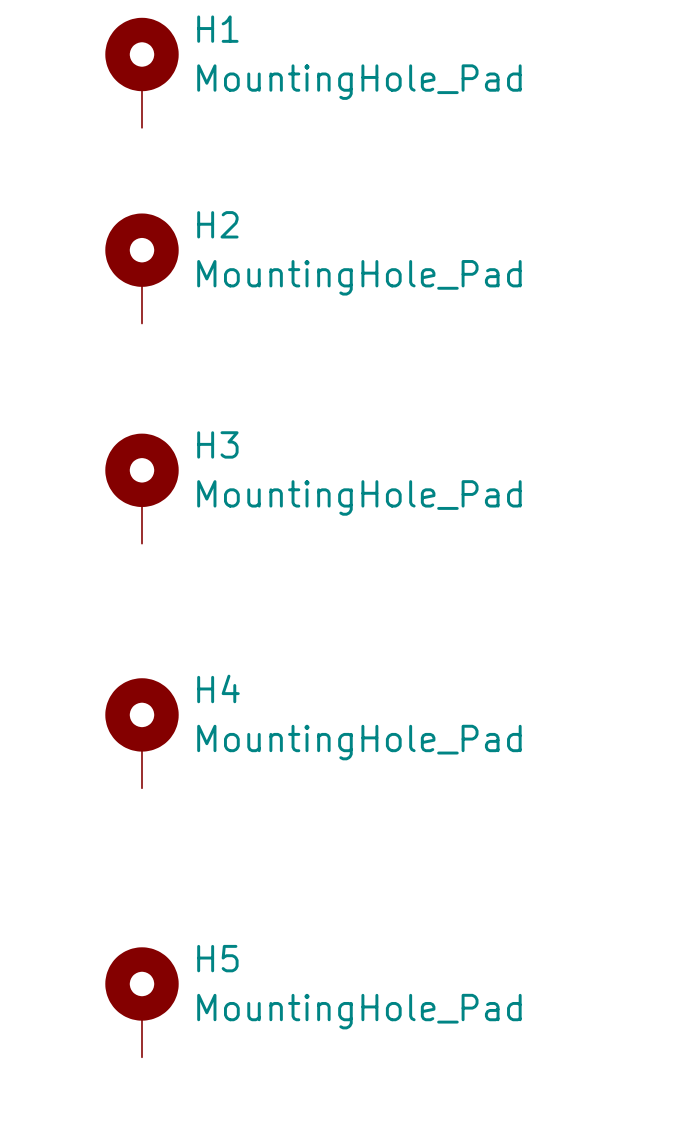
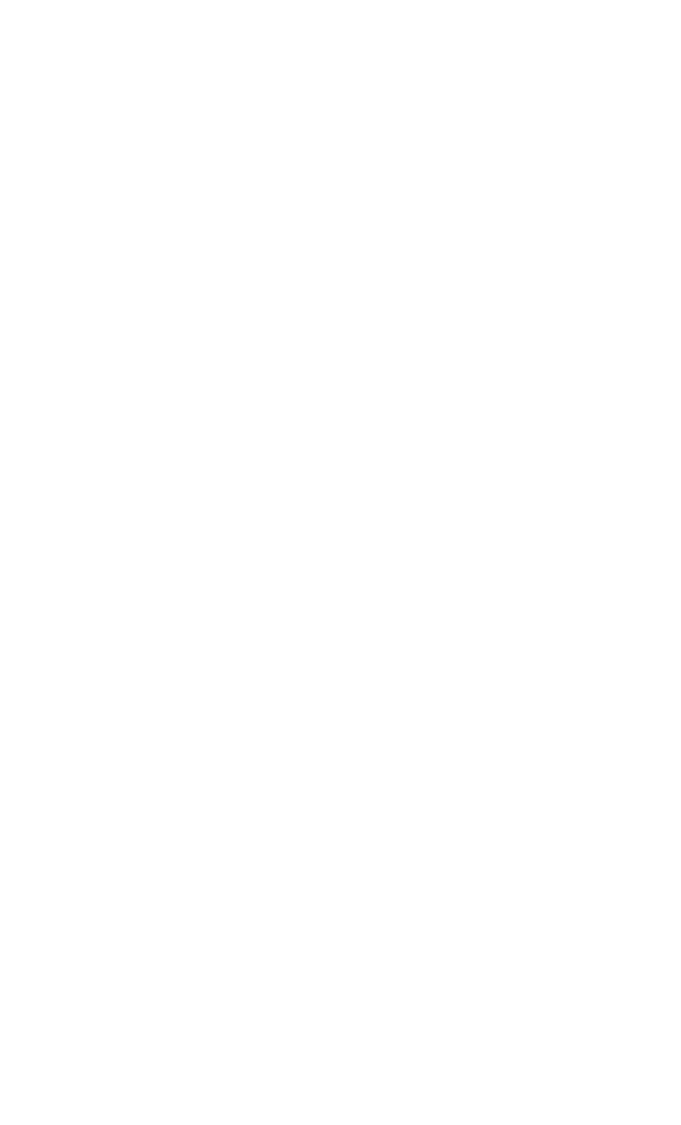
H1: MountingHole_Pad (141, 72) -> none
H2: MountingHole_Pad (141, 268) -> none
H3: MountingHole_Pad (141, 488) -> none
H4: MountingHole_Pad (141, 733) -> none
H5: MountingHole_Pad (141, 1002) -> none

